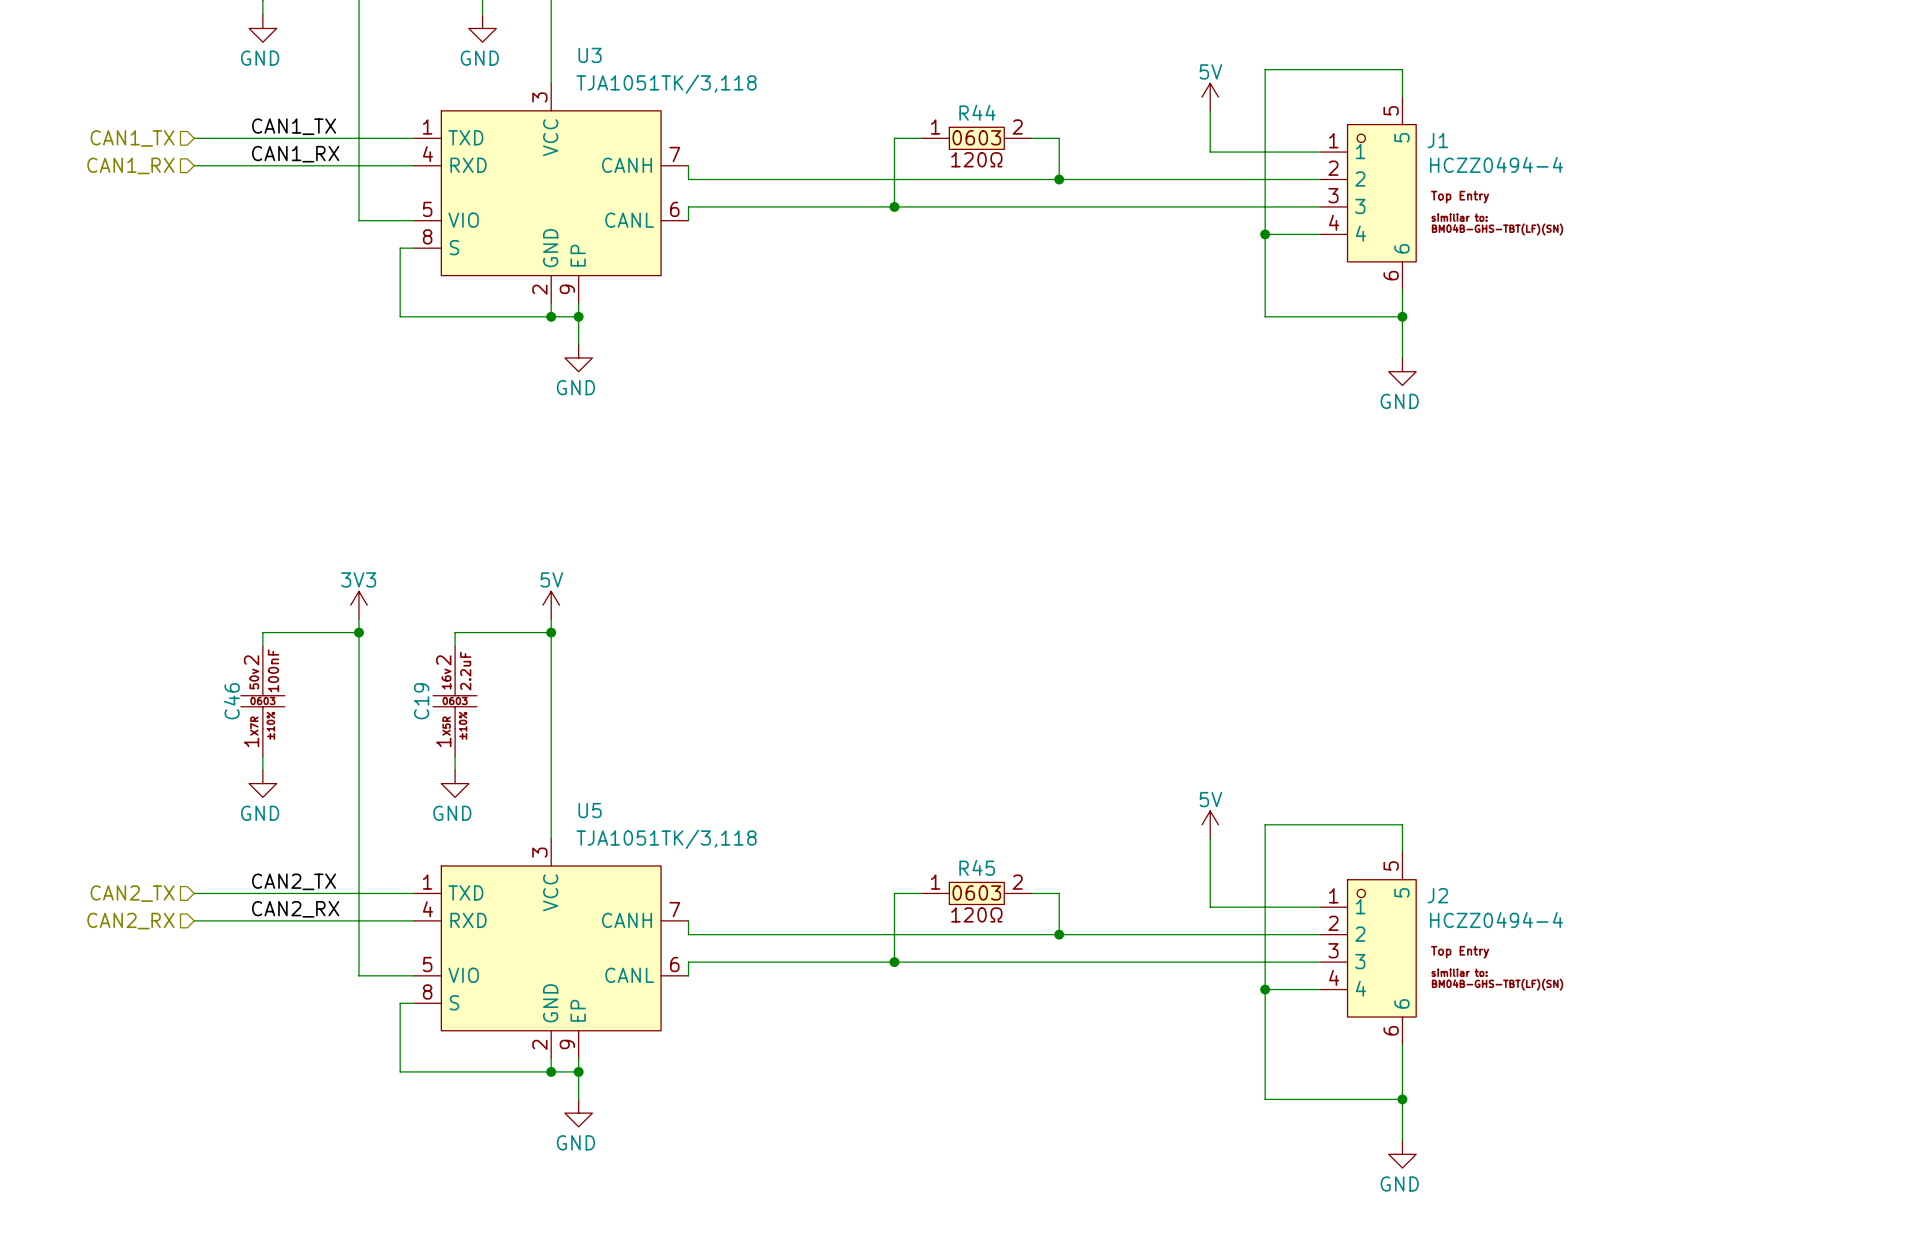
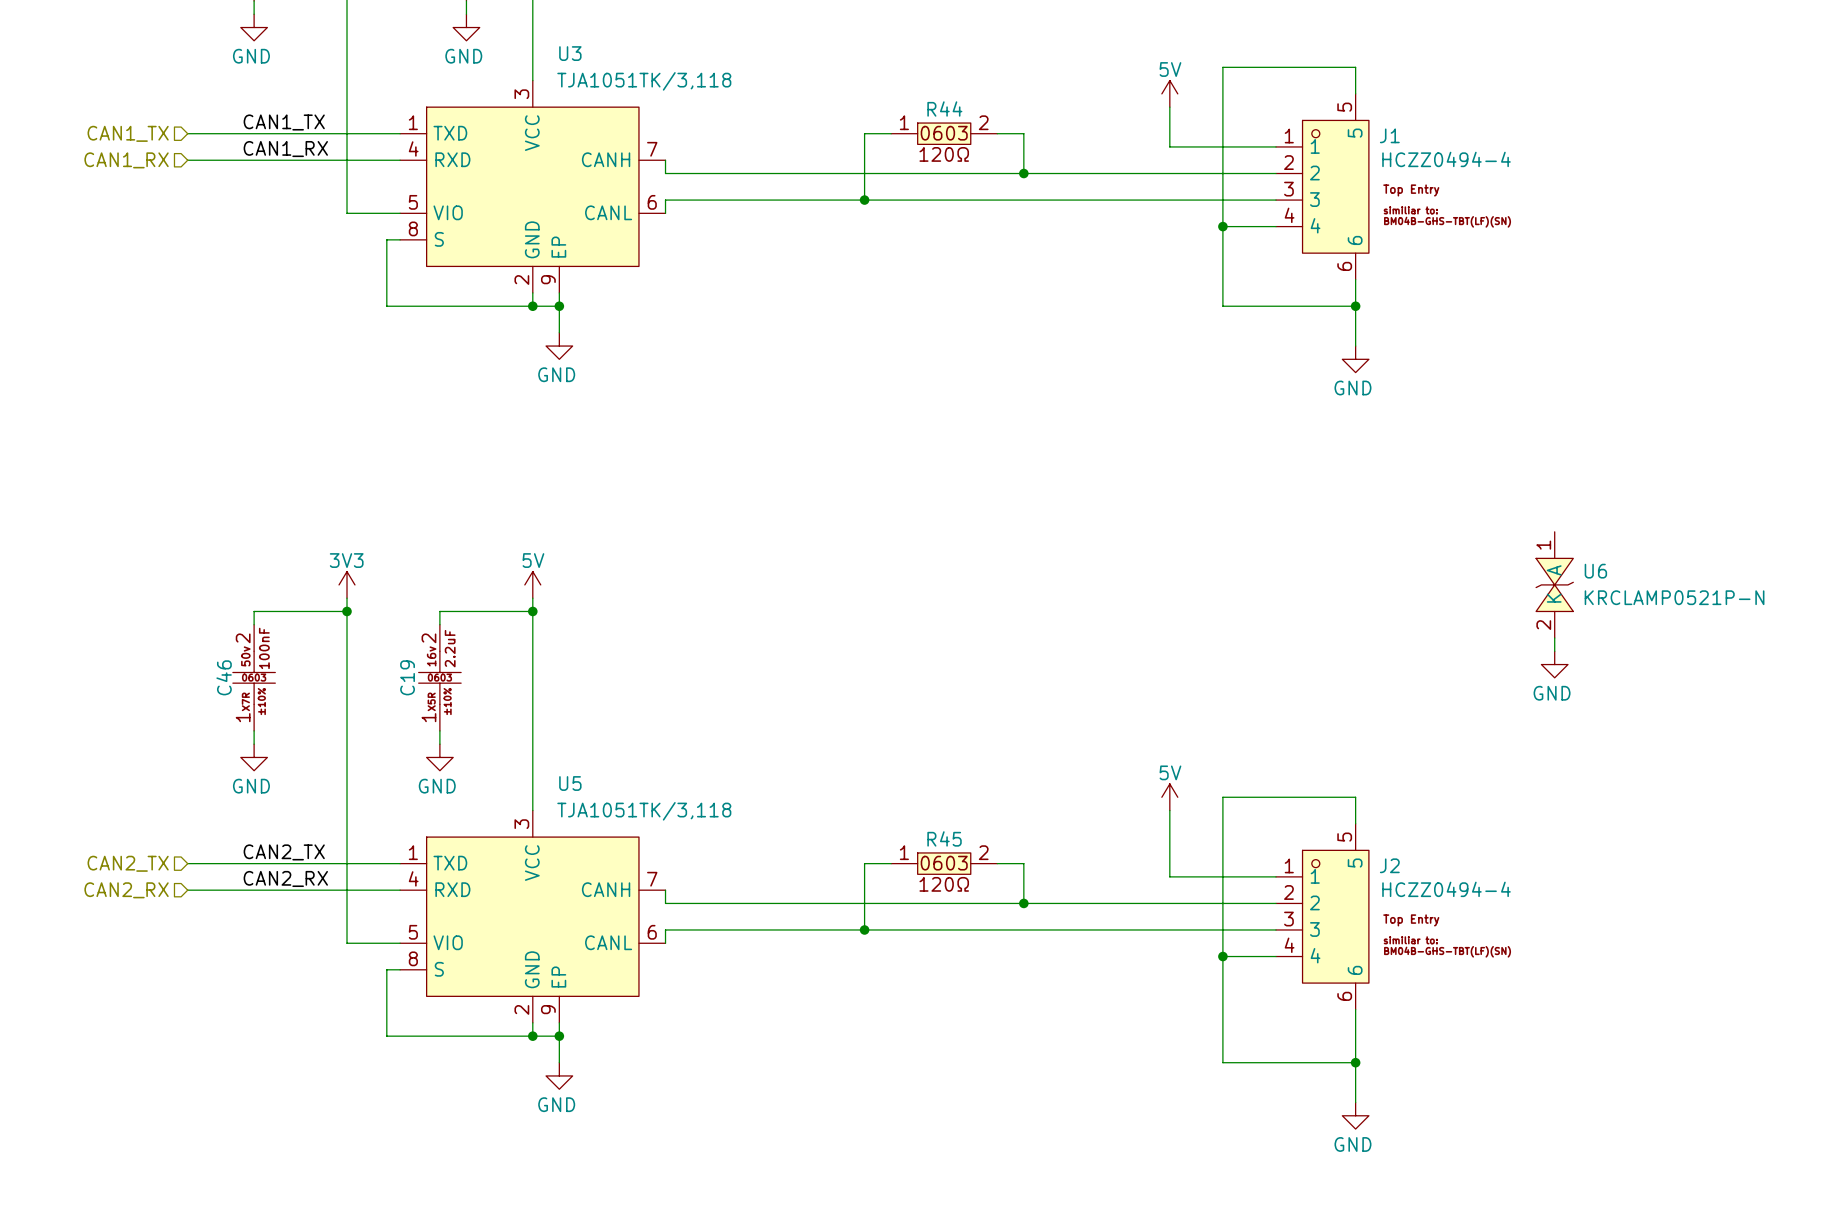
U6: none -> KRCLAMP0521P-N (1554, 584)
wire: none -> (1554, 638) (1554, 651)
power symbol: none -> GND (1554, 664)

